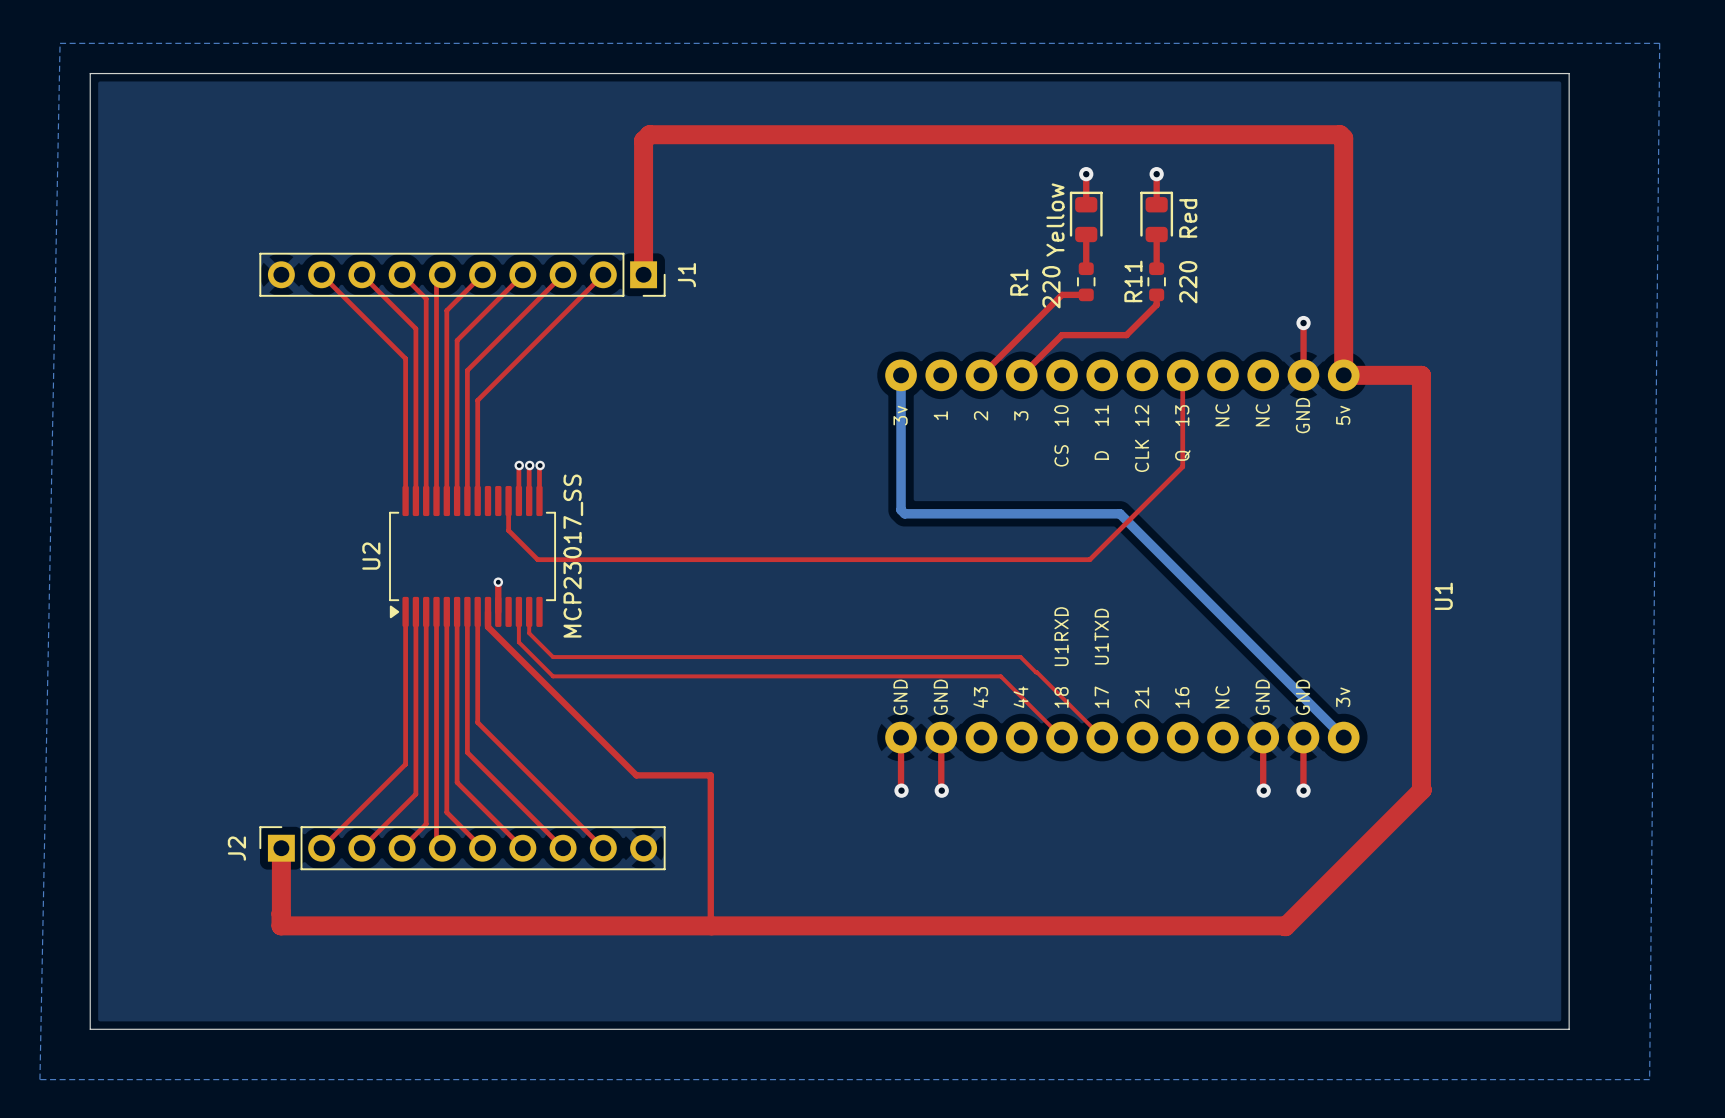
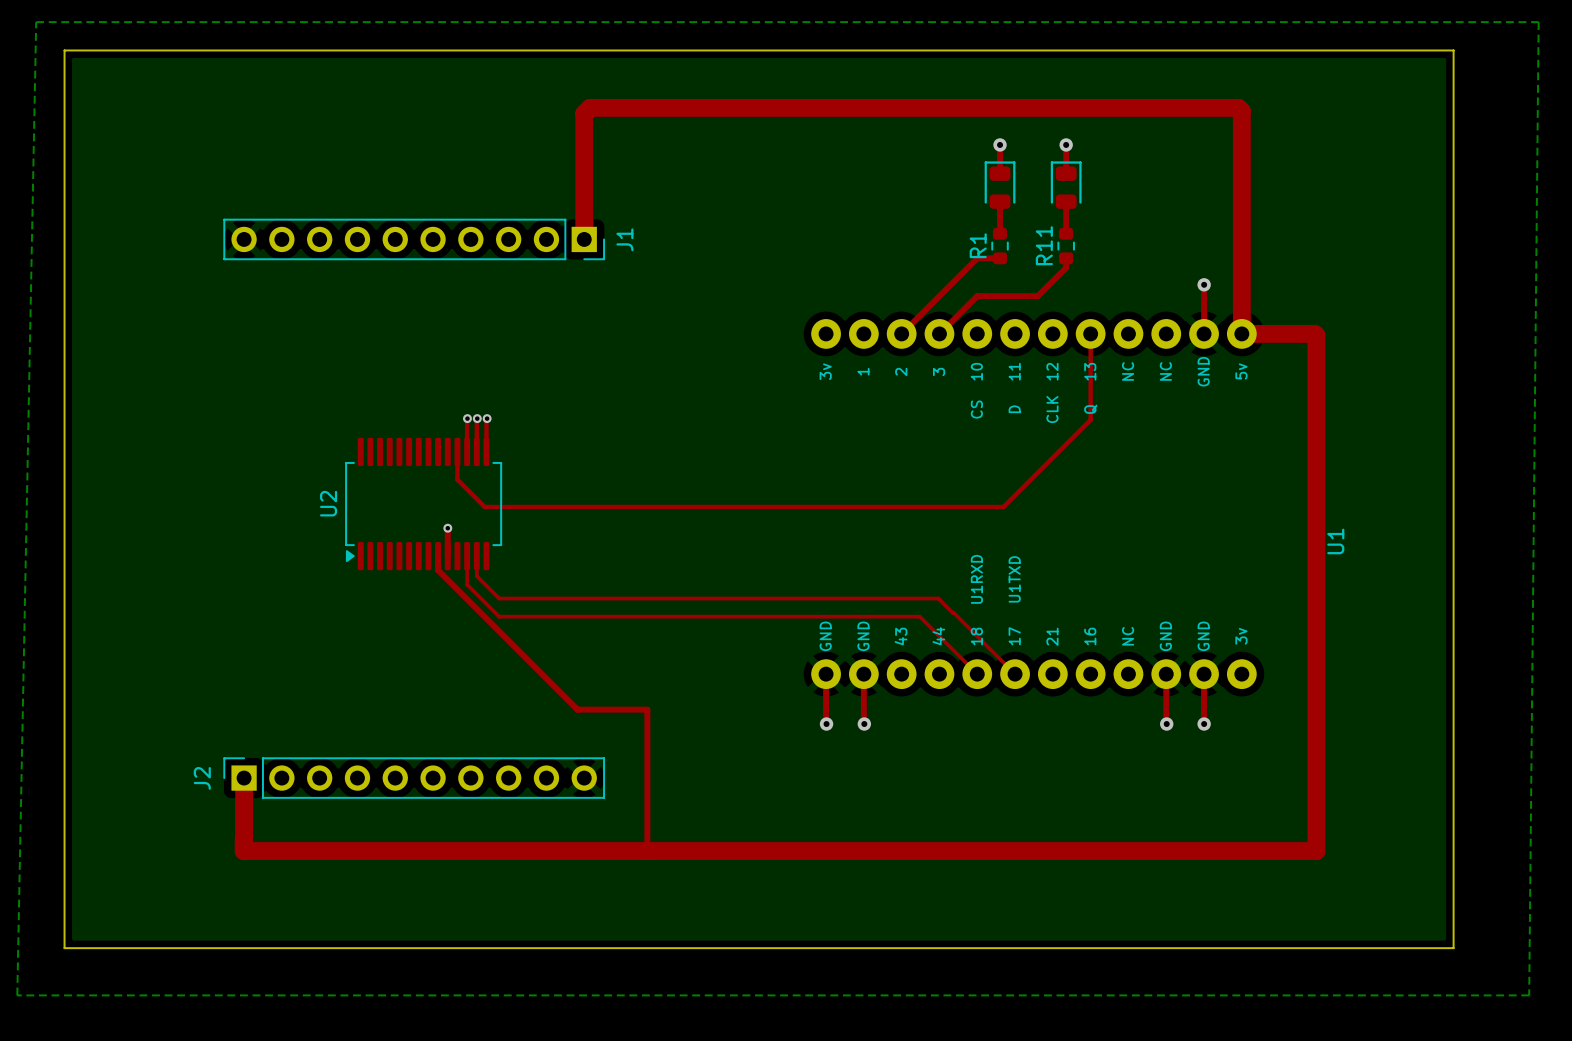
part value: Red (1188, 218) -> none
part value: Yellow (1055, 220) -> none
top track: (321, 274) (405, 358) (405, 501) -> none
top track: (361, 274) (415, 328) (415, 501) -> none
top track: (402, 274) (426, 298) (426, 501) -> none
top track: (442, 274) (436, 280) (436, 501) -> none
top track: (482, 274) (446, 310) (446, 501) -> none
top track: (522, 274) (457, 340) (457, 501) -> none
top track: (563, 274) (467, 370) (467, 501) -> none
top track: (603, 274) (477, 400) (477, 501) -> none
R1 name position: R1 (1019, 282) -> R1 (978, 245)
R11 value: 220 (1188, 282) -> none
R1 value: 220 (1051, 287) -> none
U1 footprint: [885, 359, 1360, 754] -> [811, 319, 1257, 690]
bottom track: (901, 375) (901, 510) (904, 513) (1119, 513) (1343, 737) -> none
top track: (1421, 375) (1422, 789) (1284, 925) -> (1314, 333) (1316, 335) (1316, 851) (1186, 851)
U2 value: MCP23017_SS (573, 556) -> none
top track: (405, 611) (405, 764) (321, 848) -> none
top track: (415, 611) (415, 794) (361, 848) -> none
top track: (426, 611) (426, 824) (402, 848) -> none
top track: (436, 611) (436, 842) (442, 848) -> none
top track: (446, 611) (446, 812) (482, 848) -> none
top track: (457, 611) (457, 782) (522, 848) -> none
top track: (467, 611) (467, 752) (563, 848) -> none
top track: (477, 611) (477, 722) (603, 848) -> none

